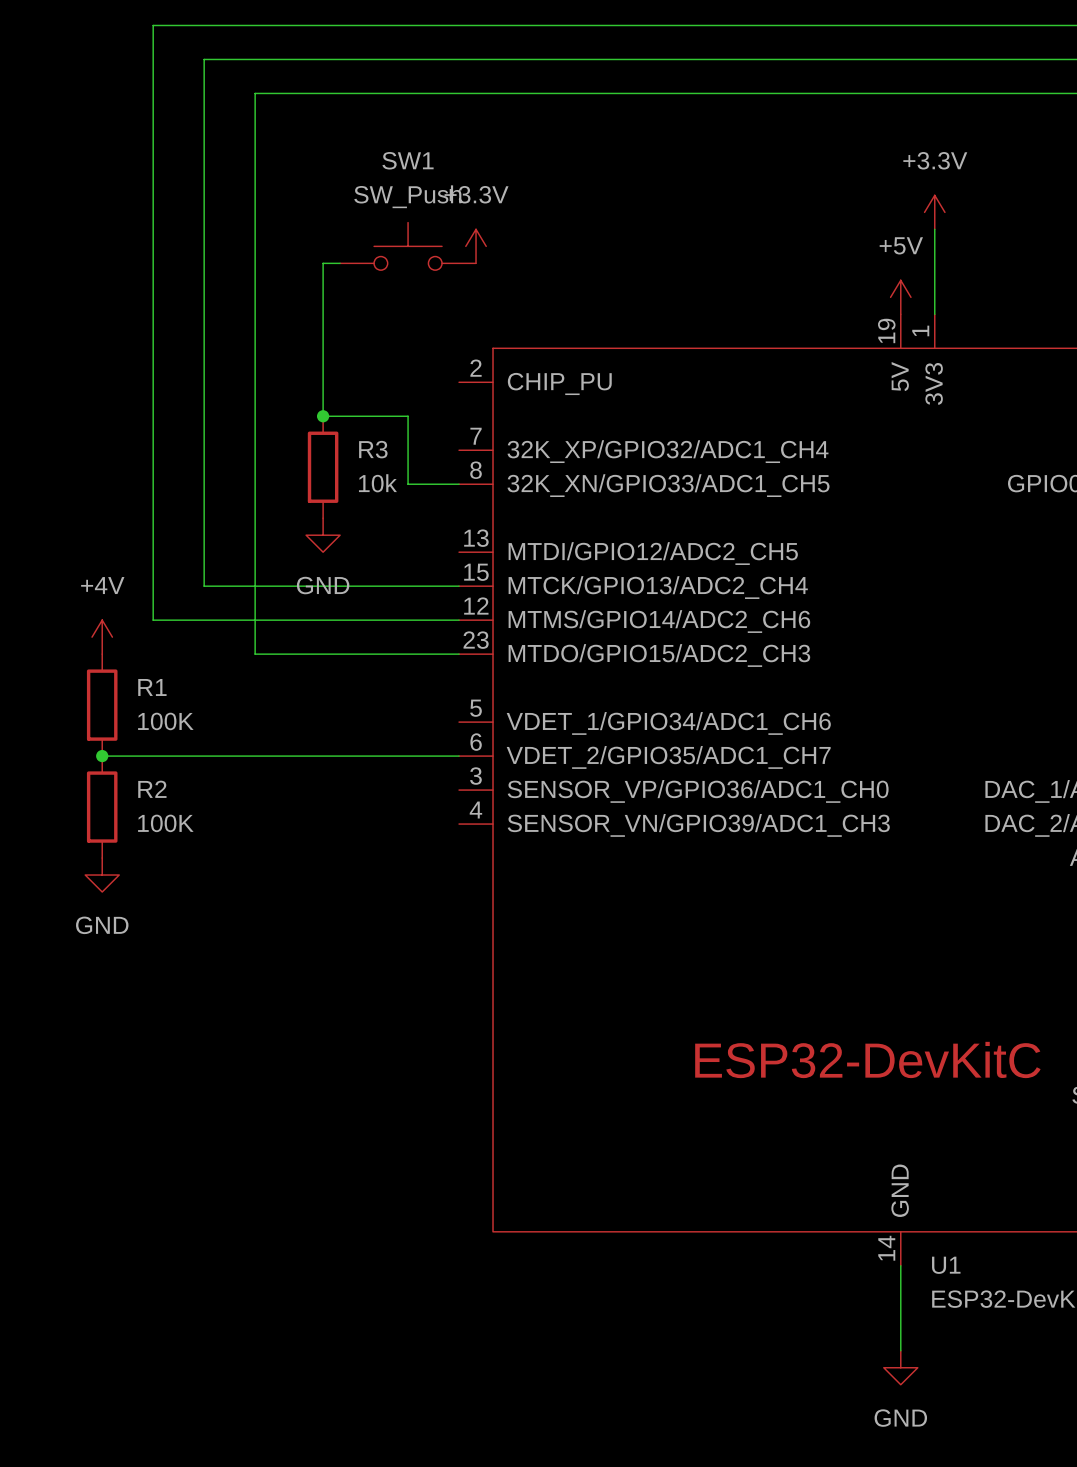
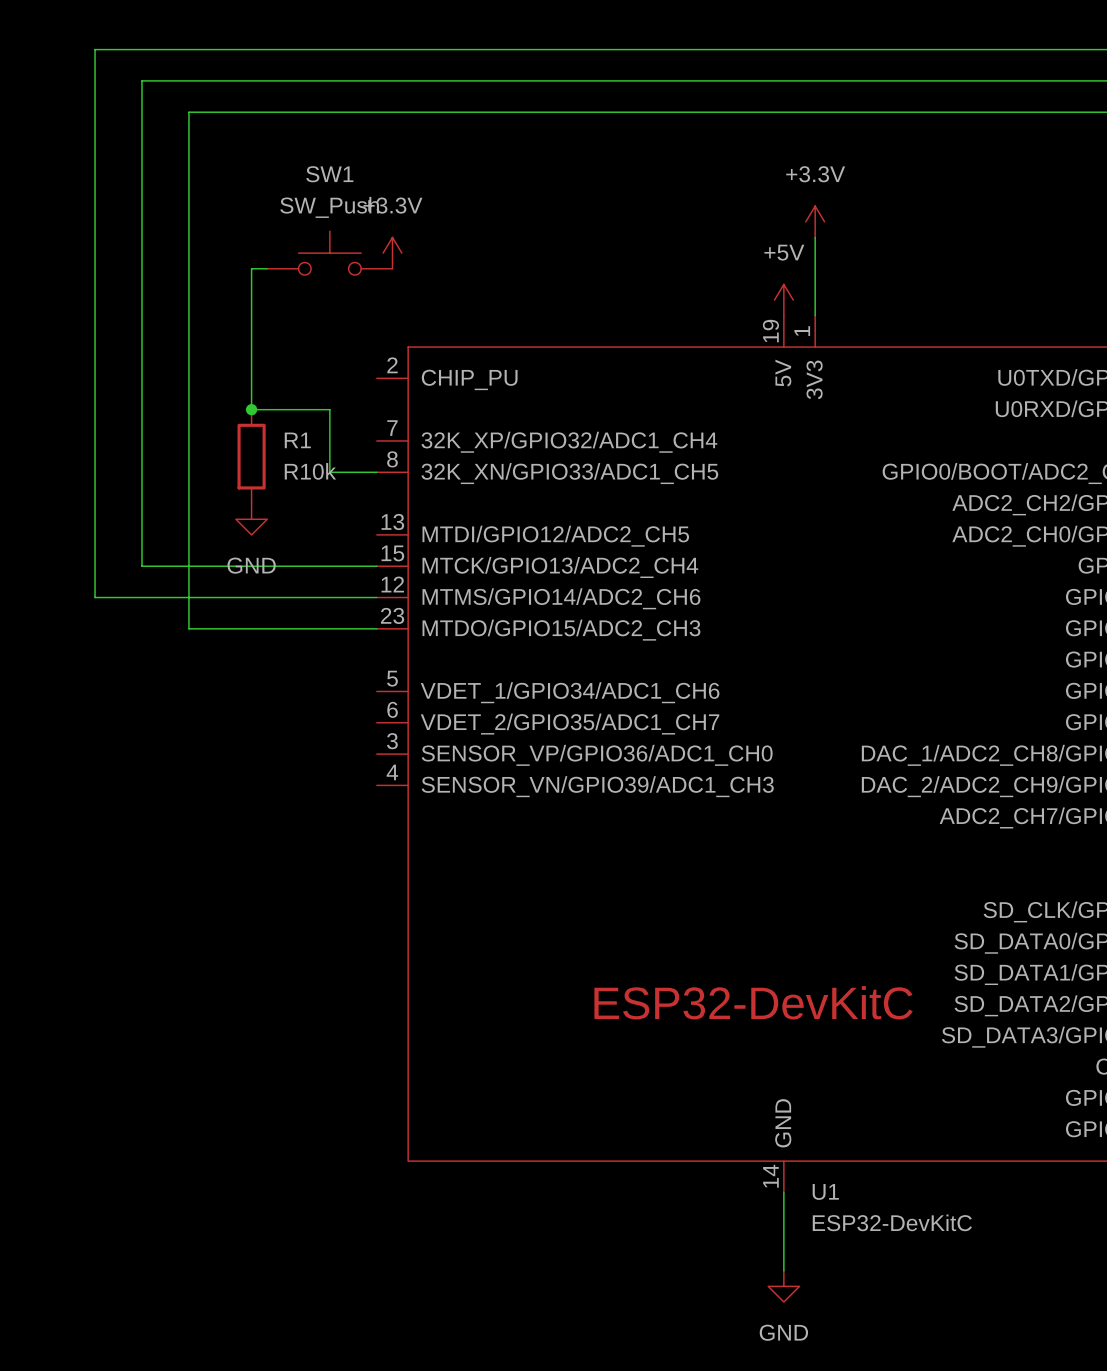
R3 name: R3 (373, 449) -> R1 (297, 440)
R3 value: 10k (377, 483) -> R10k (310, 471)
power symbol: +4V (102, 637) -> none
R1: 100K (102, 705) -> none
wire: (102, 756) (459, 756) -> none
junction: (102, 756) -> none
R2: 100K (102, 807) -> none
power symbol: GND (102, 875) -> none

